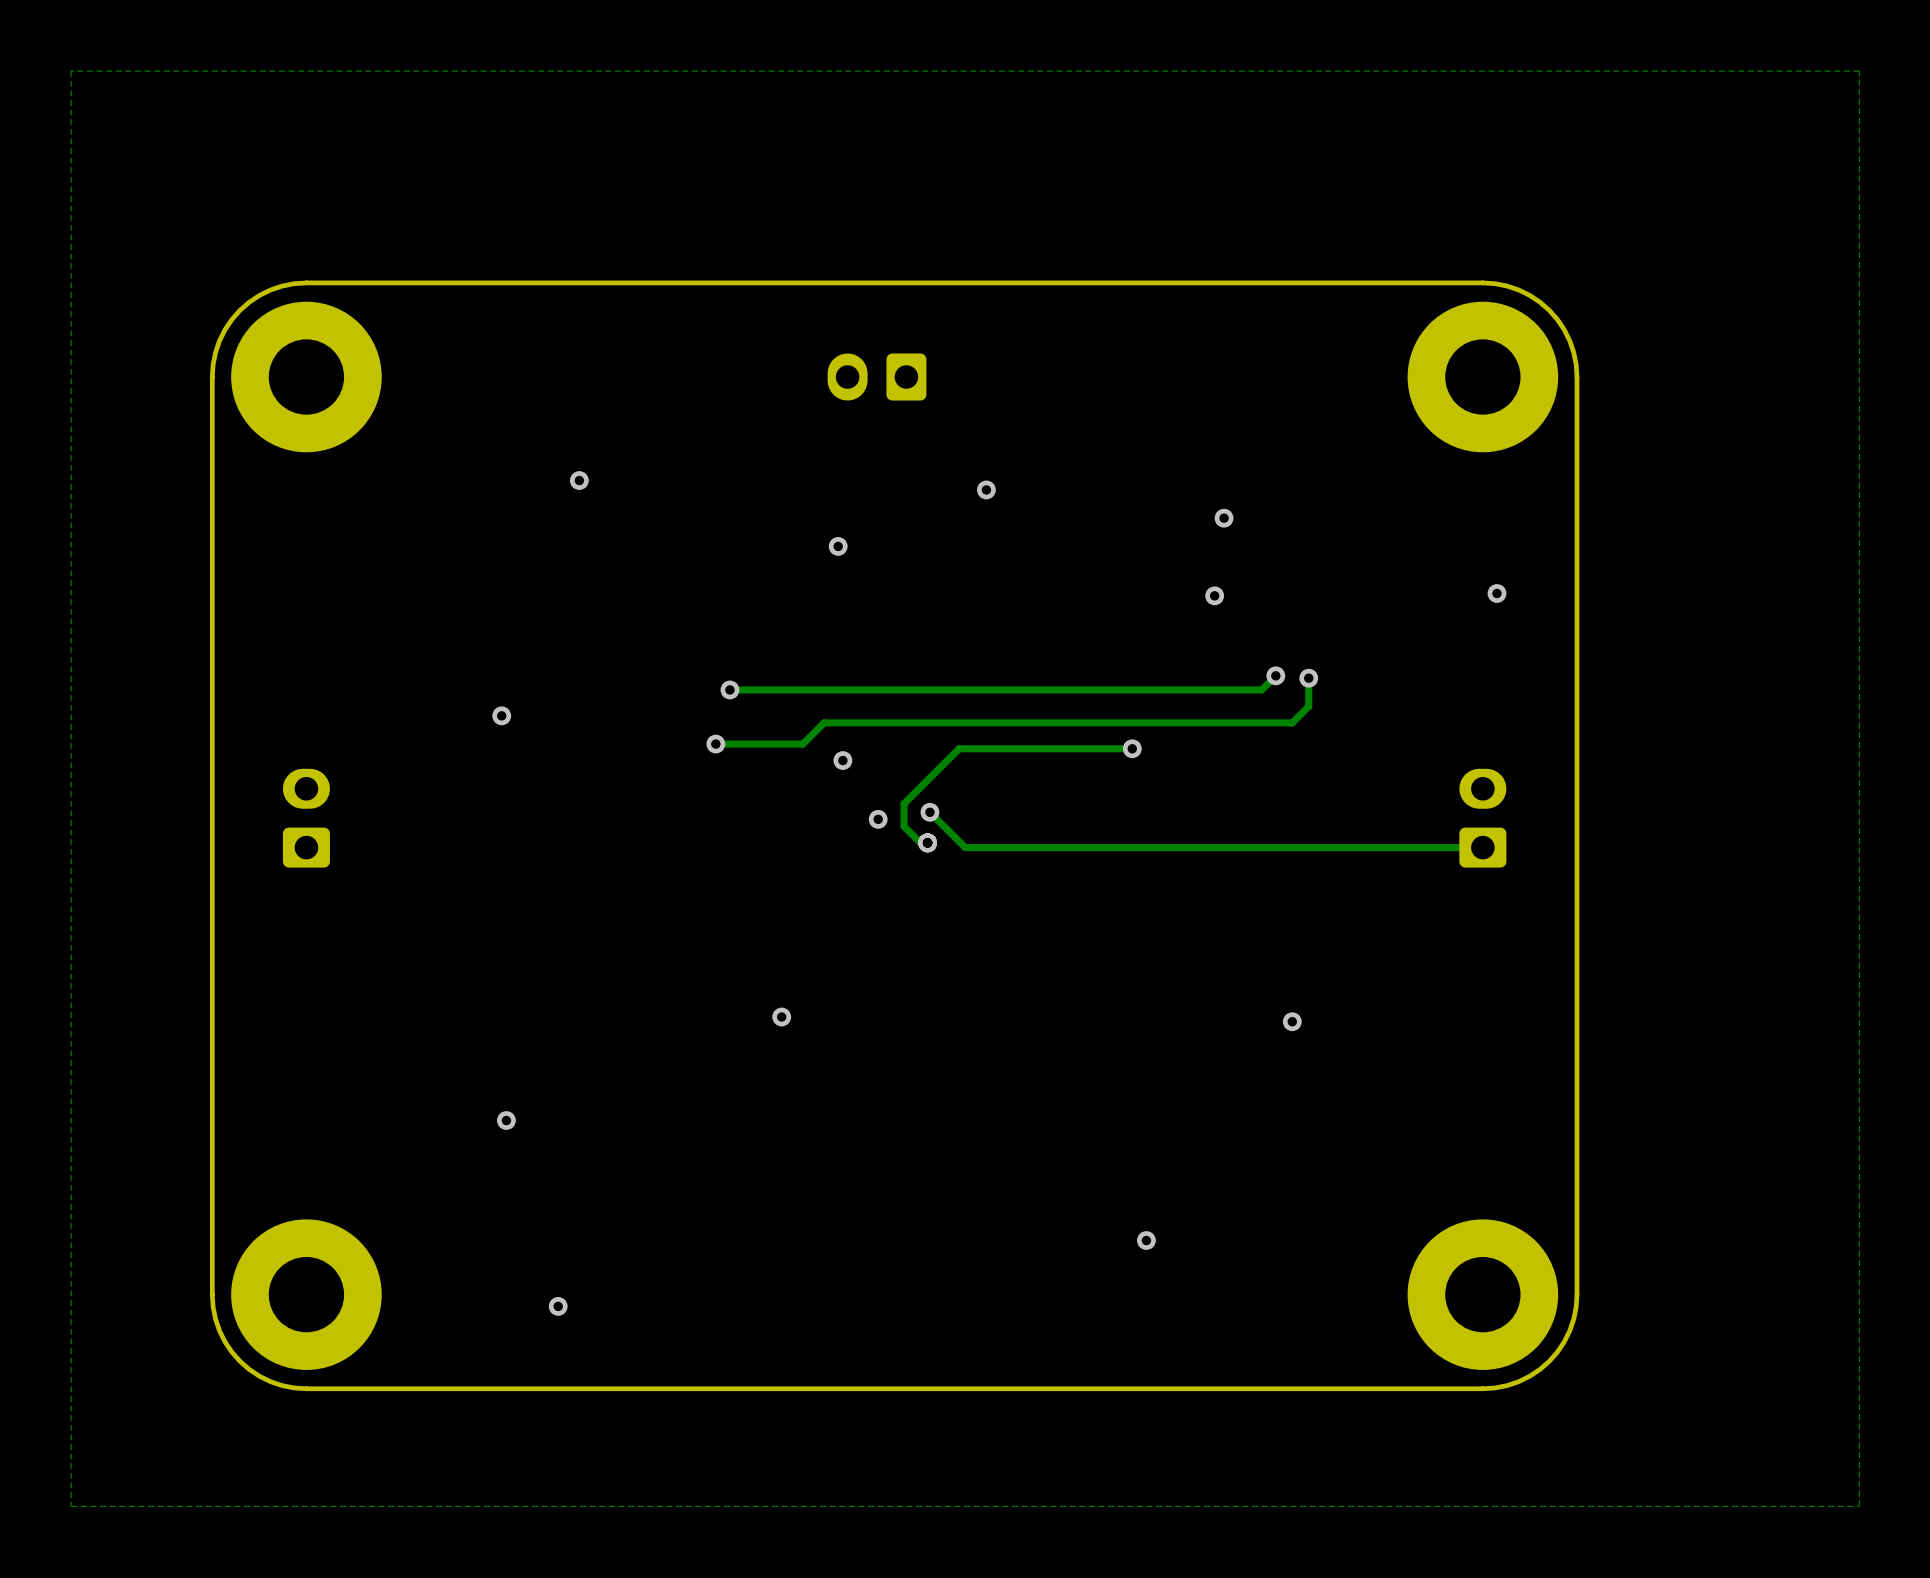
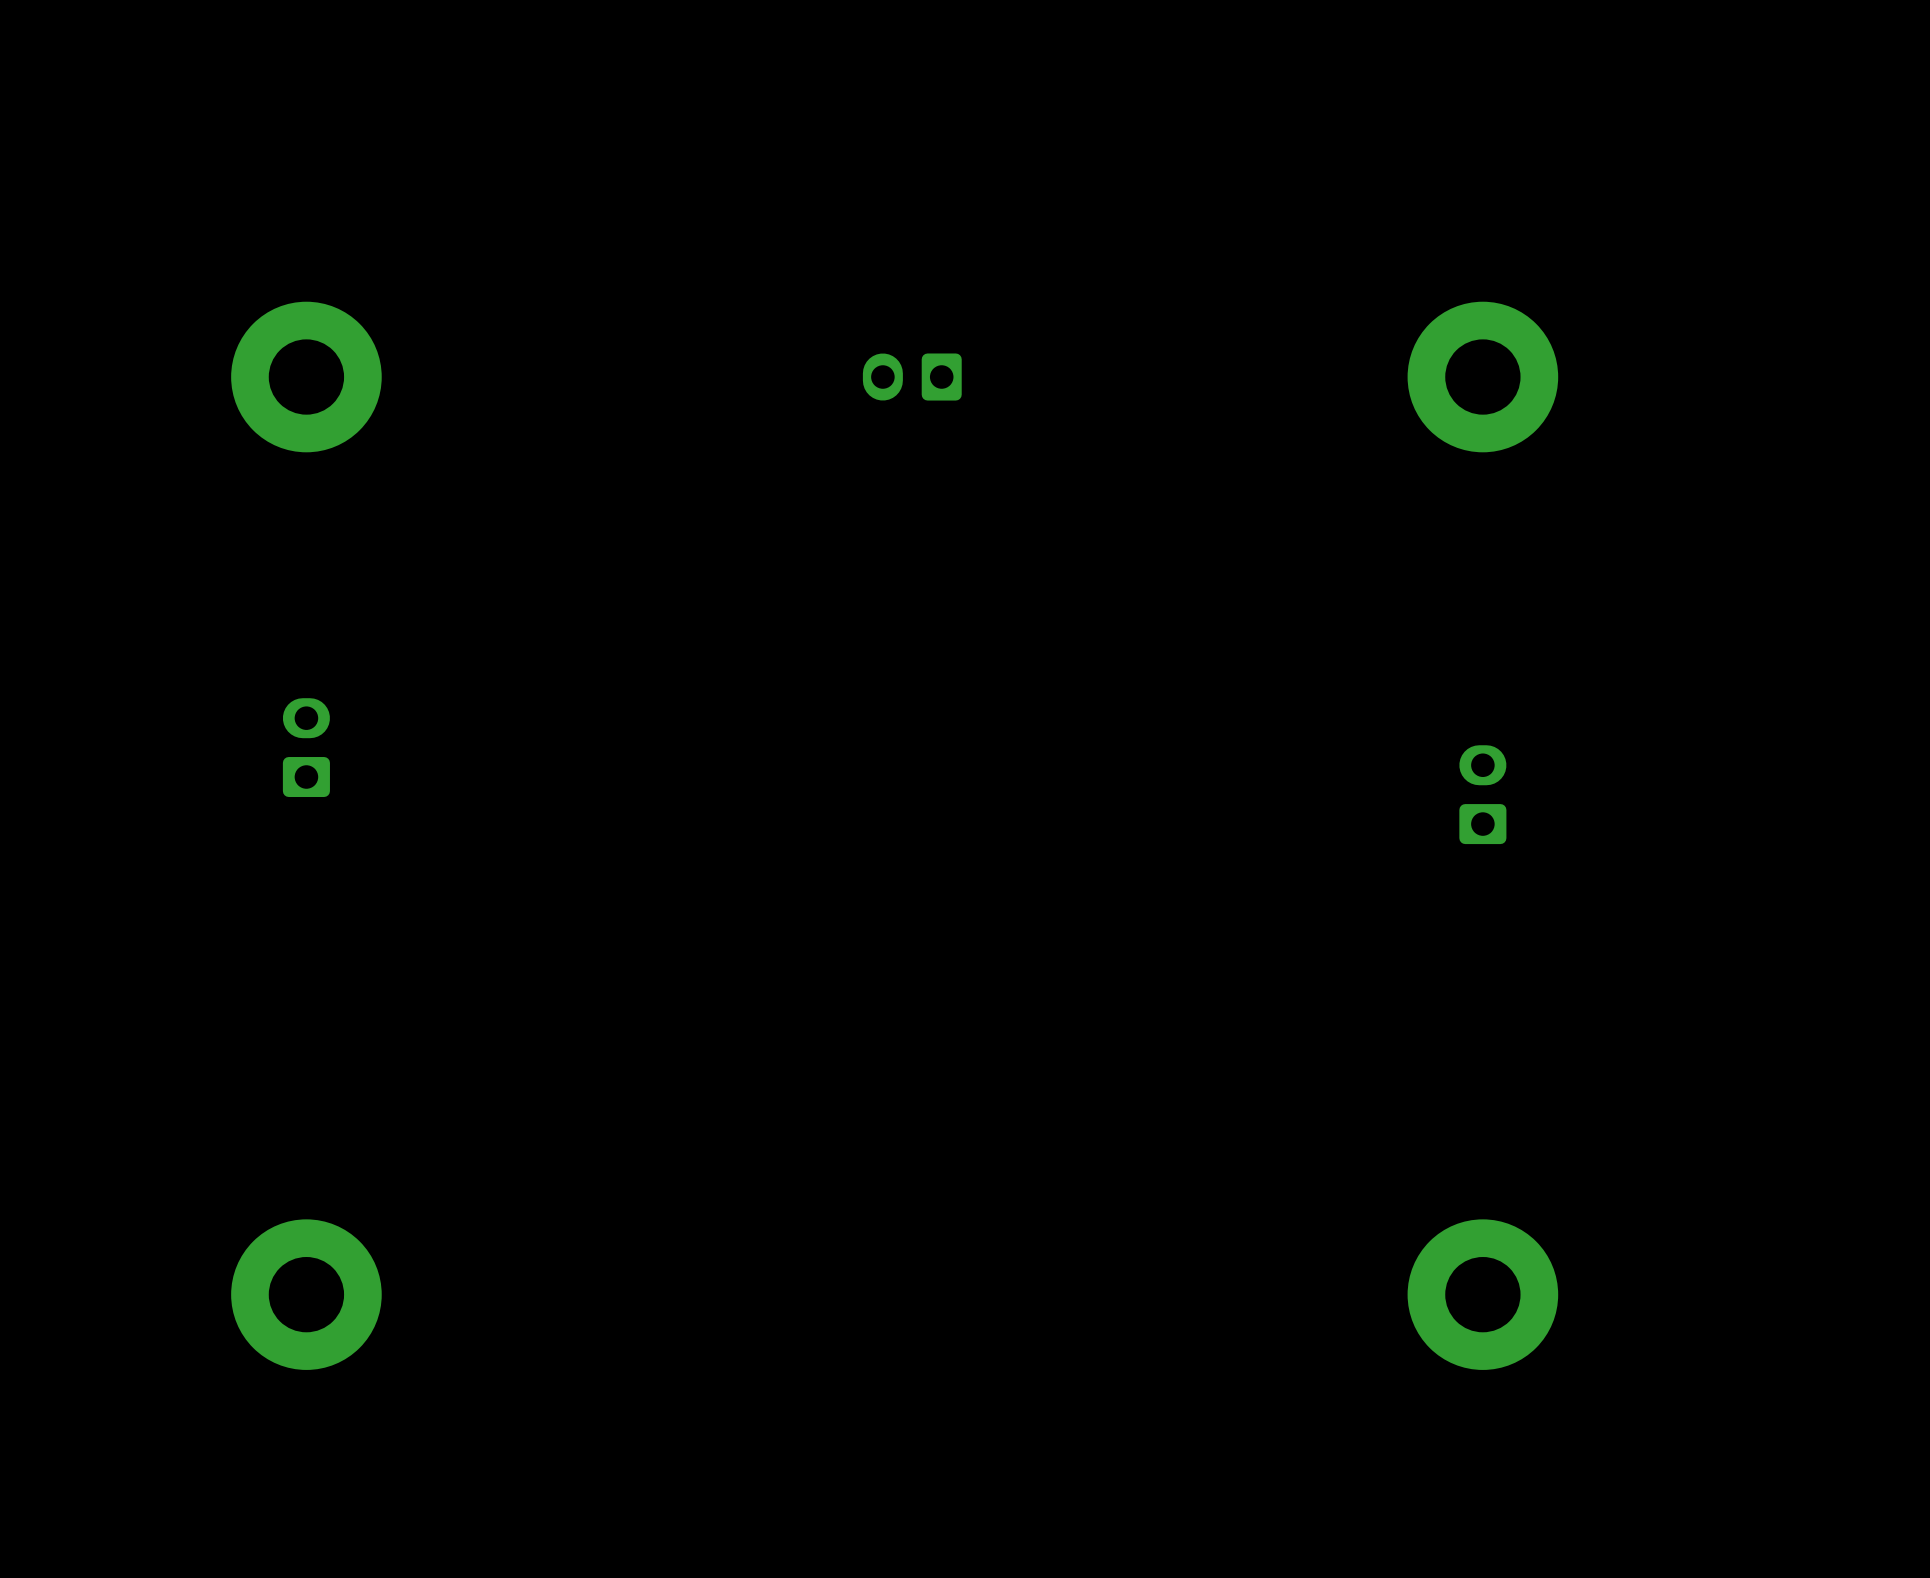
zone outline: (1859, 71) (1859, 1506) (71, 1506) (71, 71) (1859, 71) -> none
board edge: (1482, 282) (306, 282) (294, 283) (270, 290) (249, 302) (231, 319) (219, 340) (213, 364) (212, 377) (212, 1294) (213, 1306) (219, 1330) (231, 1351) (249, 1369) (270, 1381) (294, 1387) (306, 1388) (1482, 1388) (1507, 1385) (1518, 1381) (1540, 1369) (1549, 1361) (1564, 1341) (1573, 1319) (1577, 1294) (1577, 377) (1576, 364) (1569, 340) (1557, 319) (1549, 310) (1540, 302) (1518, 290) (1495, 283) (1482, 282) -> none
part position: (877, 377) -> (912, 377)
via: (579, 480) -> none
via: (986, 489) -> none
via: (1224, 518) -> none
via: (838, 546) -> none
via: (1497, 593) -> none
via: (1214, 595) -> none
track: (1275, 675) (1261, 689) (729, 689) -> none
via: (1275, 675) -> none
track: (1308, 678) (1308, 706) (1292, 722) (824, 722) (802, 744) (715, 744) -> none
via: (1308, 678) -> none
via: (729, 689) -> none
via: (501, 715) -> none
via: (715, 744) -> none
track: (1132, 748) (959, 748) (904, 803) (904, 826) (920, 842) (927, 842) -> none
via: (1132, 748) -> none
via: (842, 760) -> none
track: (929, 812) (965, 847) (1482, 847) -> none
via: (929, 812) -> none
part position: (306, 818) -> (306, 747)
part position: (1482, 818) -> (1482, 794)
via: (878, 819) -> none
via: (927, 842) -> none
via: (781, 1017) -> none
via: (1292, 1021) -> none
via: (506, 1120) -> none
via: (1146, 1240) -> none
via: (558, 1306) -> none

